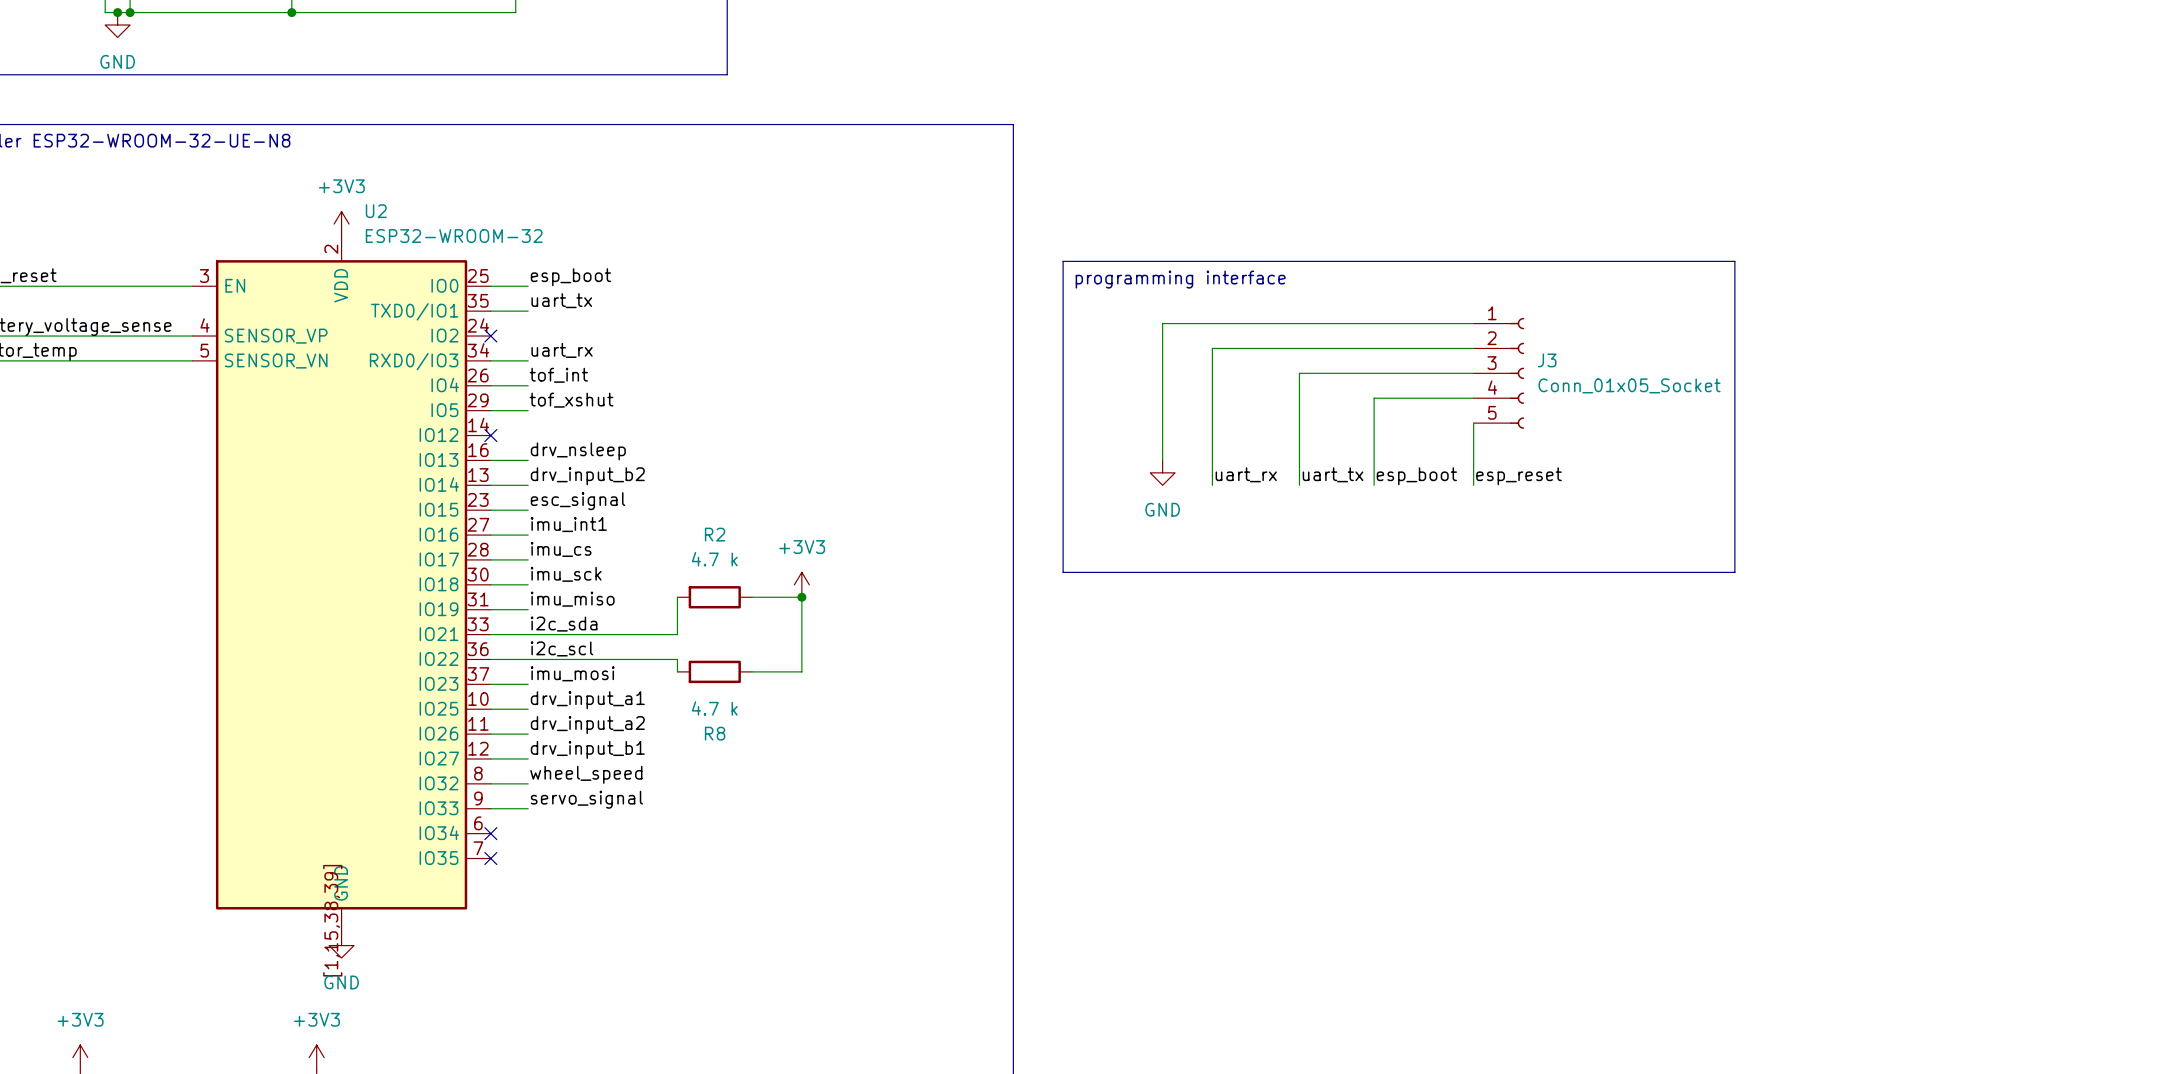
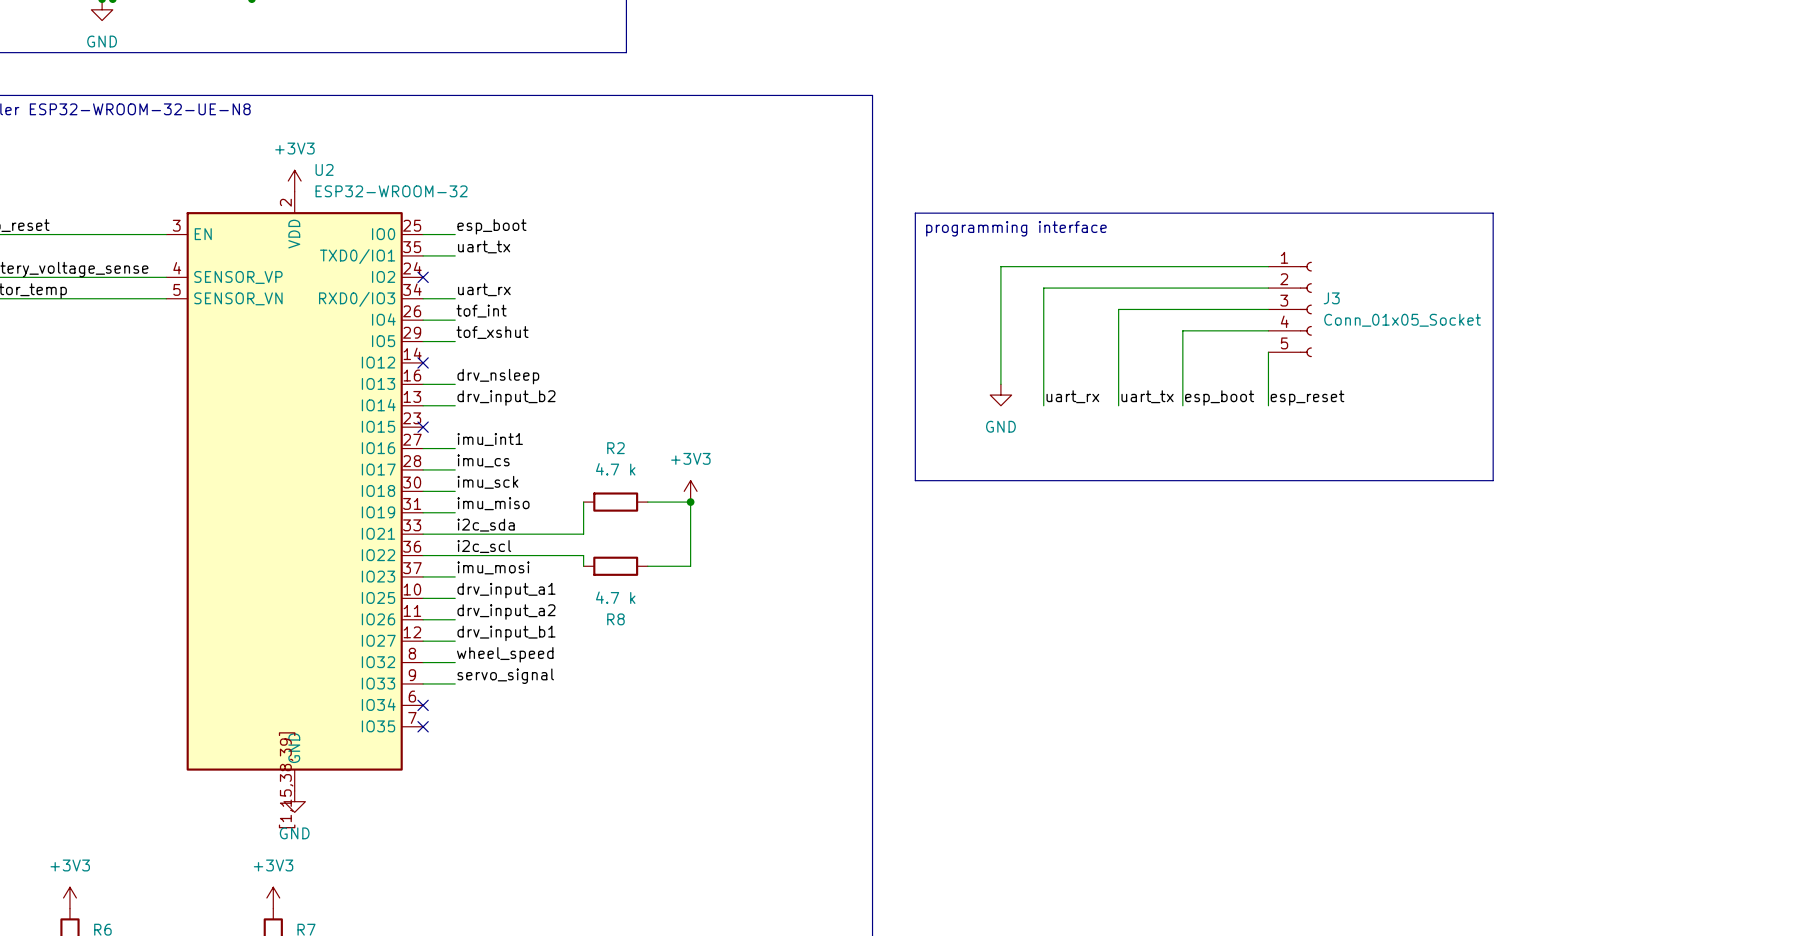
label: esc_signal (578, 501) -> none
wire: (490, 510) (528, 510) -> none
no-connect mark: none -> (423, 427)

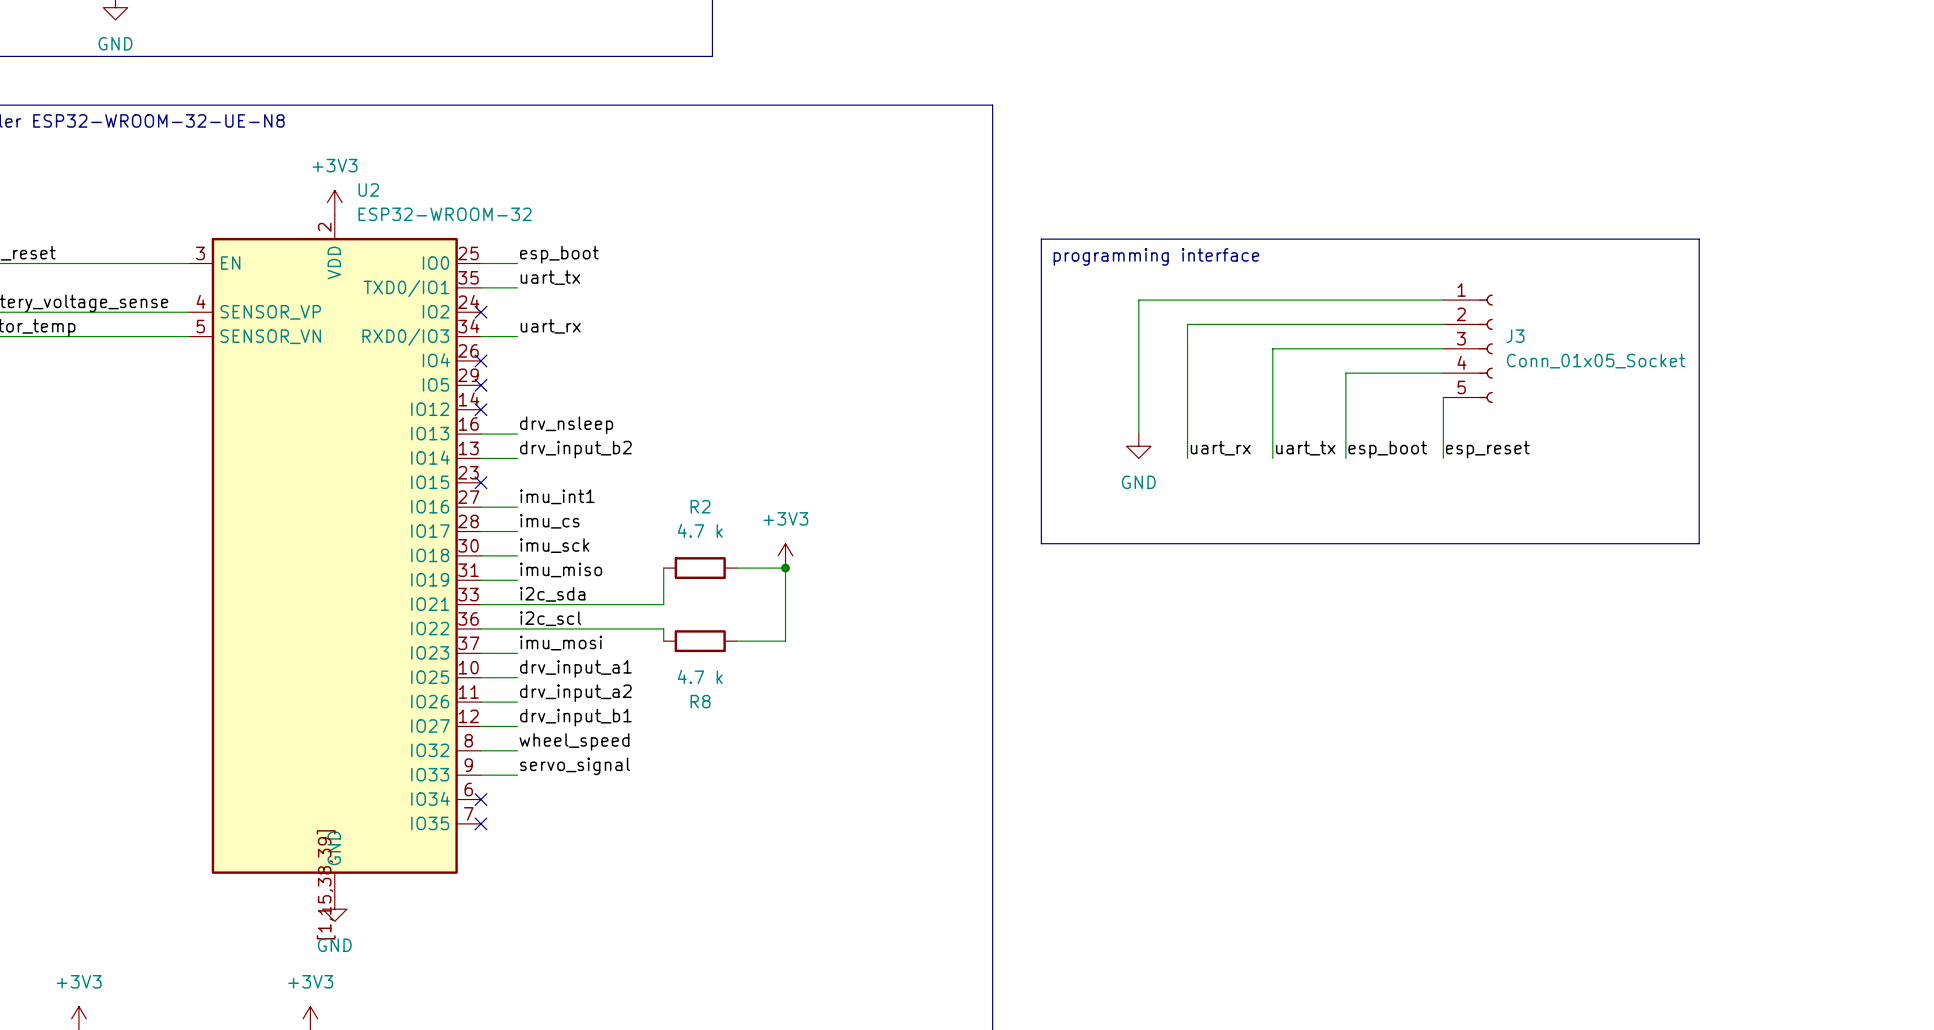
label: tof_int (481, 311) -> none
wire: (423, 320) (455, 320) -> none
no-connect mark: none -> (480, 360)
label: tof_xshut (492, 332) -> none
wire: (423, 341) (455, 341) -> none
no-connect mark: none -> (480, 385)

